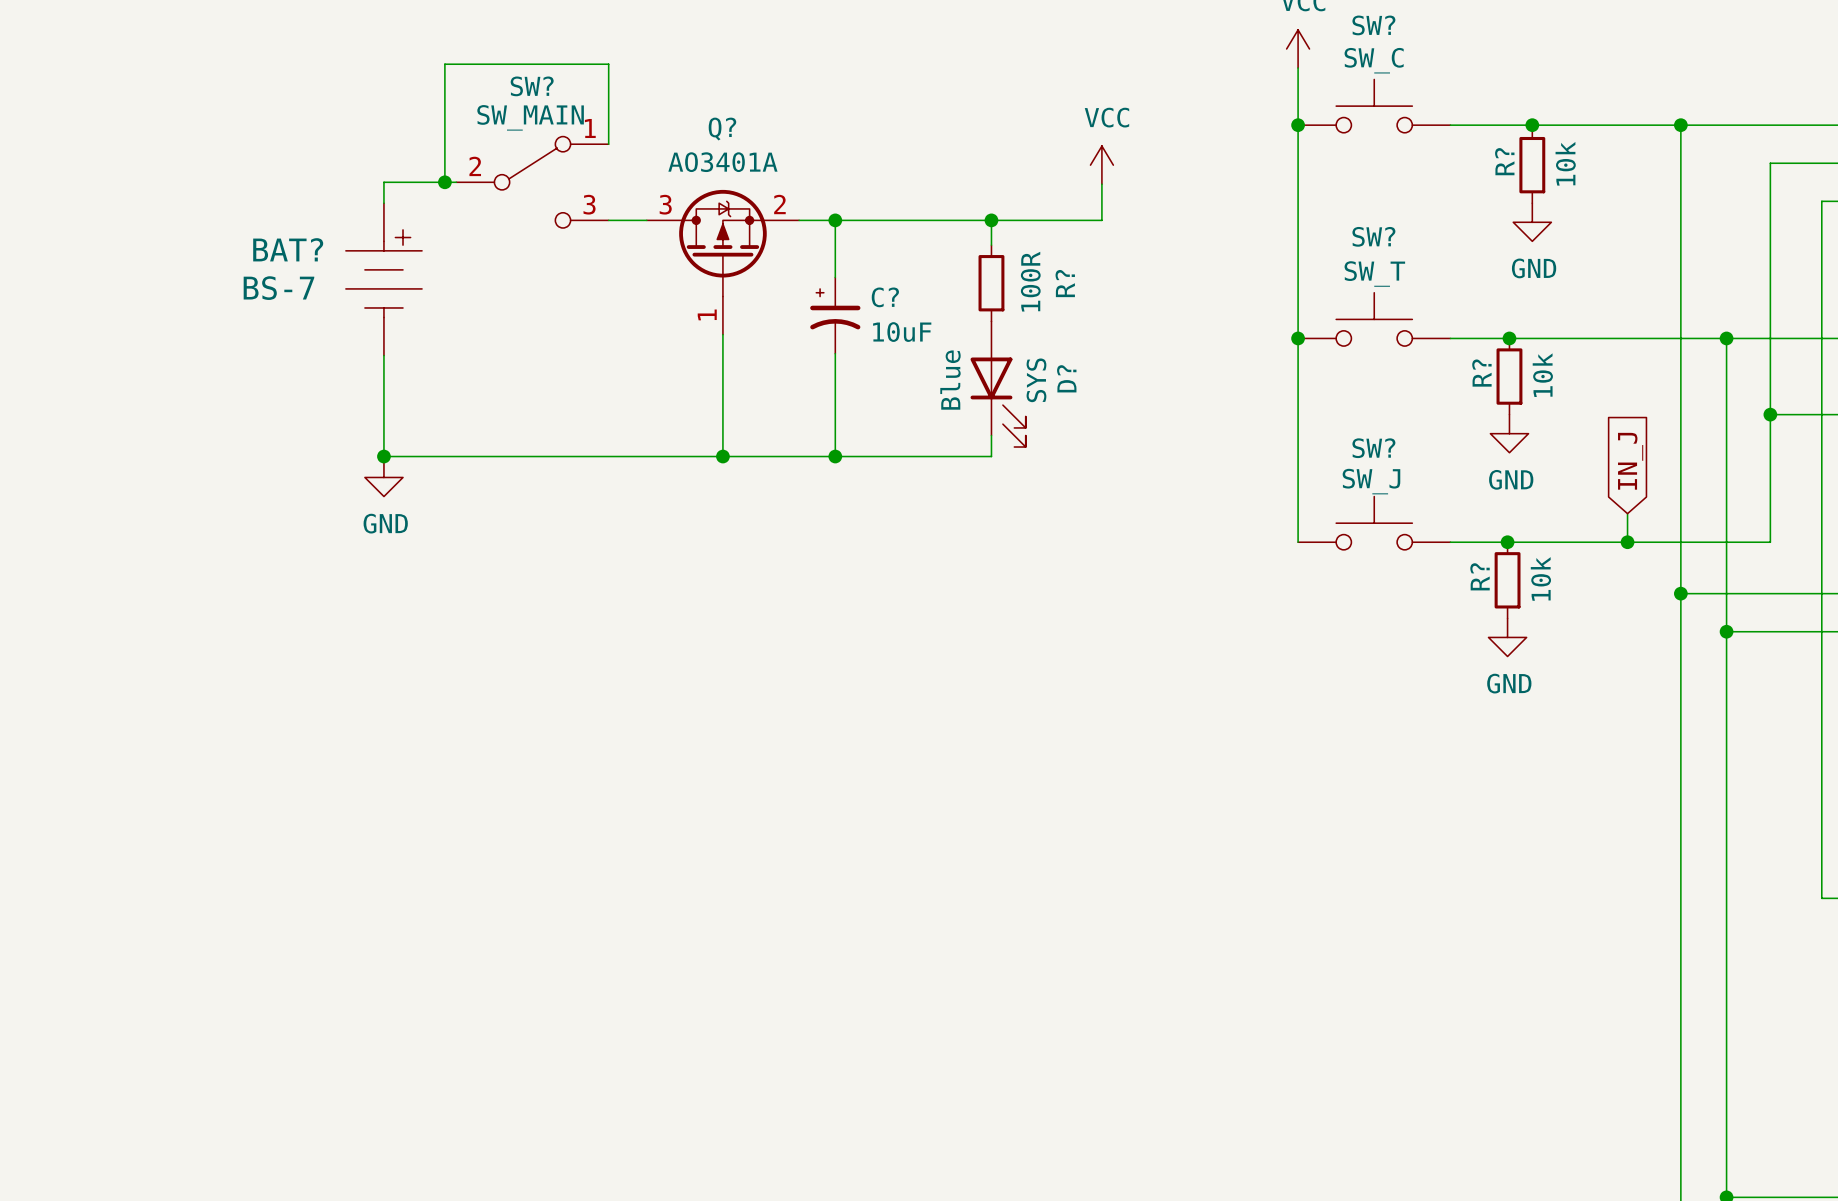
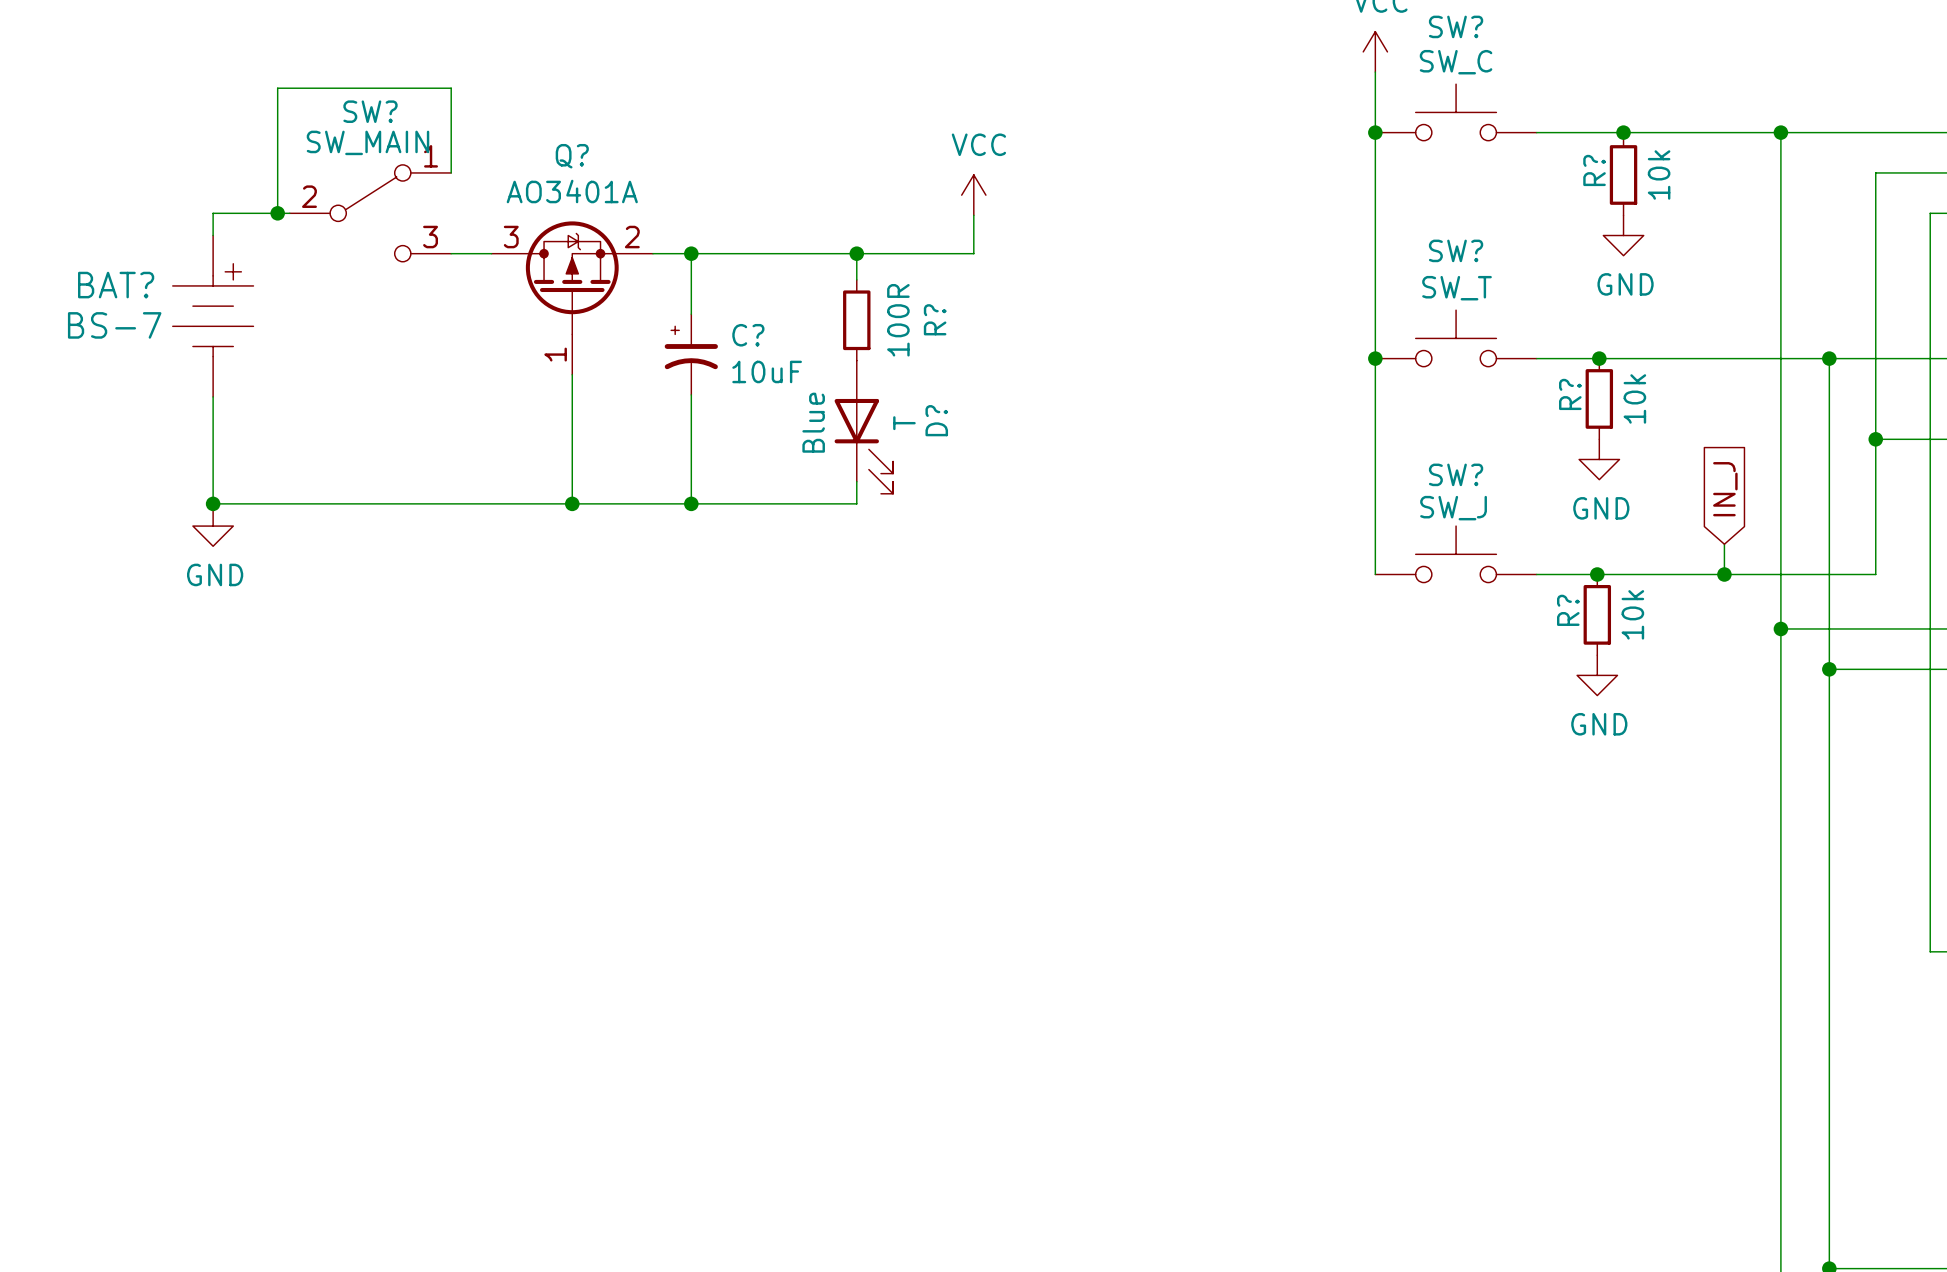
wire: (608, 144) (608, 64) (444, 64) (444, 182) -> (451, 172) (451, 88) (277, 88) (277, 213)
power symbol position: VCC (1101, 165) -> VCC (973, 195)
junction: (444, 182) -> none
wire: (456, 182) (383, 182) (383, 203) -> (289, 213) (213, 213) (213, 235)
SW? position: (532, 182) -> (370, 213)
wire: (1101, 184) (1101, 220) (799, 220) -> (973, 215) (973, 253) (652, 253)
junction: none -> (277, 213)
wire: (608, 220) (646, 220) -> (451, 253) (491, 253)
wire: (835, 220) (835, 277) -> (691, 253) (691, 314)
junction position: (835, 220) -> (856, 253)
wire: (991, 220) (991, 245) -> (856, 253) (856, 279)
junction: (991, 220) -> none
junction: none -> (691, 253)
Q? position: (722, 262) -> (572, 298)
BAT? position: (383, 279) -> (213, 316)
R? position: (991, 283) -> (856, 320)
C? position: (835, 315) -> (691, 354)
wire: (722, 334) (722, 456) -> (572, 374) (572, 503)
wire: (835, 353) (835, 456) -> (691, 394) (691, 503)
wire: (383, 355) (383, 458) -> (213, 396) (213, 505)
D?: SYS (998, 384) -> none
D?: none -> T (863, 427)
wire: (991, 435) (991, 456) (383, 456) -> (856, 481) (856, 503) (213, 503)
junction: (383, 456) -> none
junction position: (722, 456) -> (691, 503)
junction: (835, 456) -> none
junction: none -> (213, 503)
junction: none -> (572, 503)
power symbol position: GND (383, 477) -> GND (213, 526)

